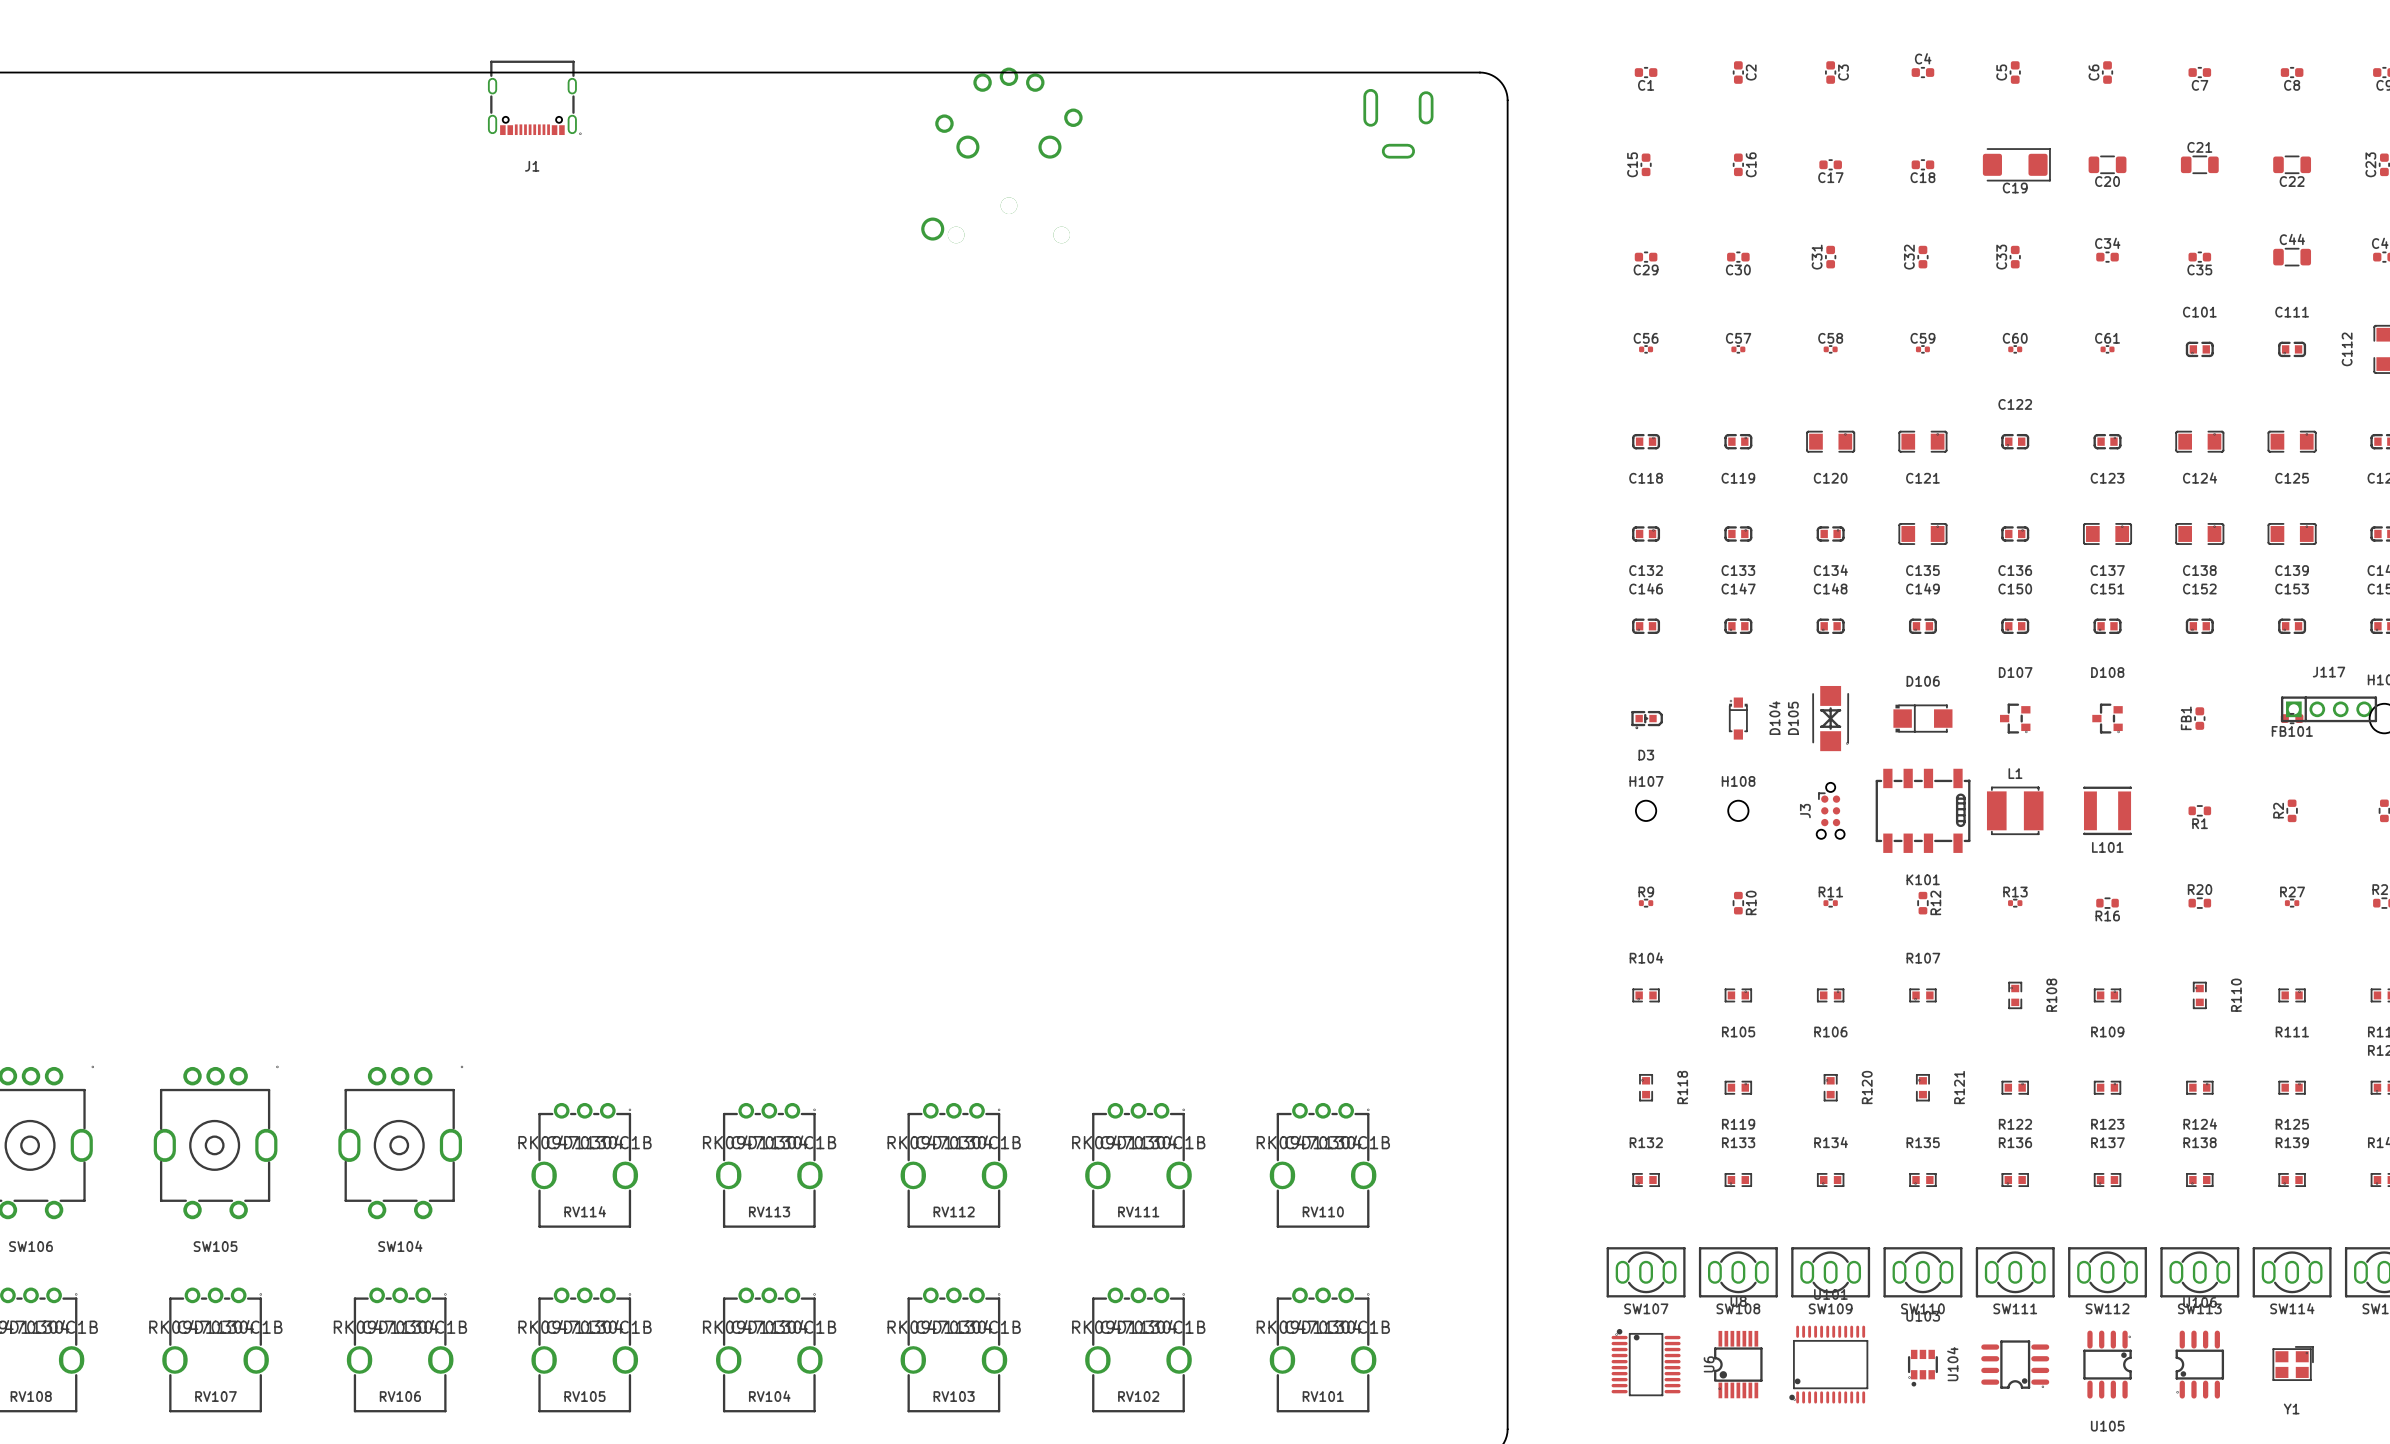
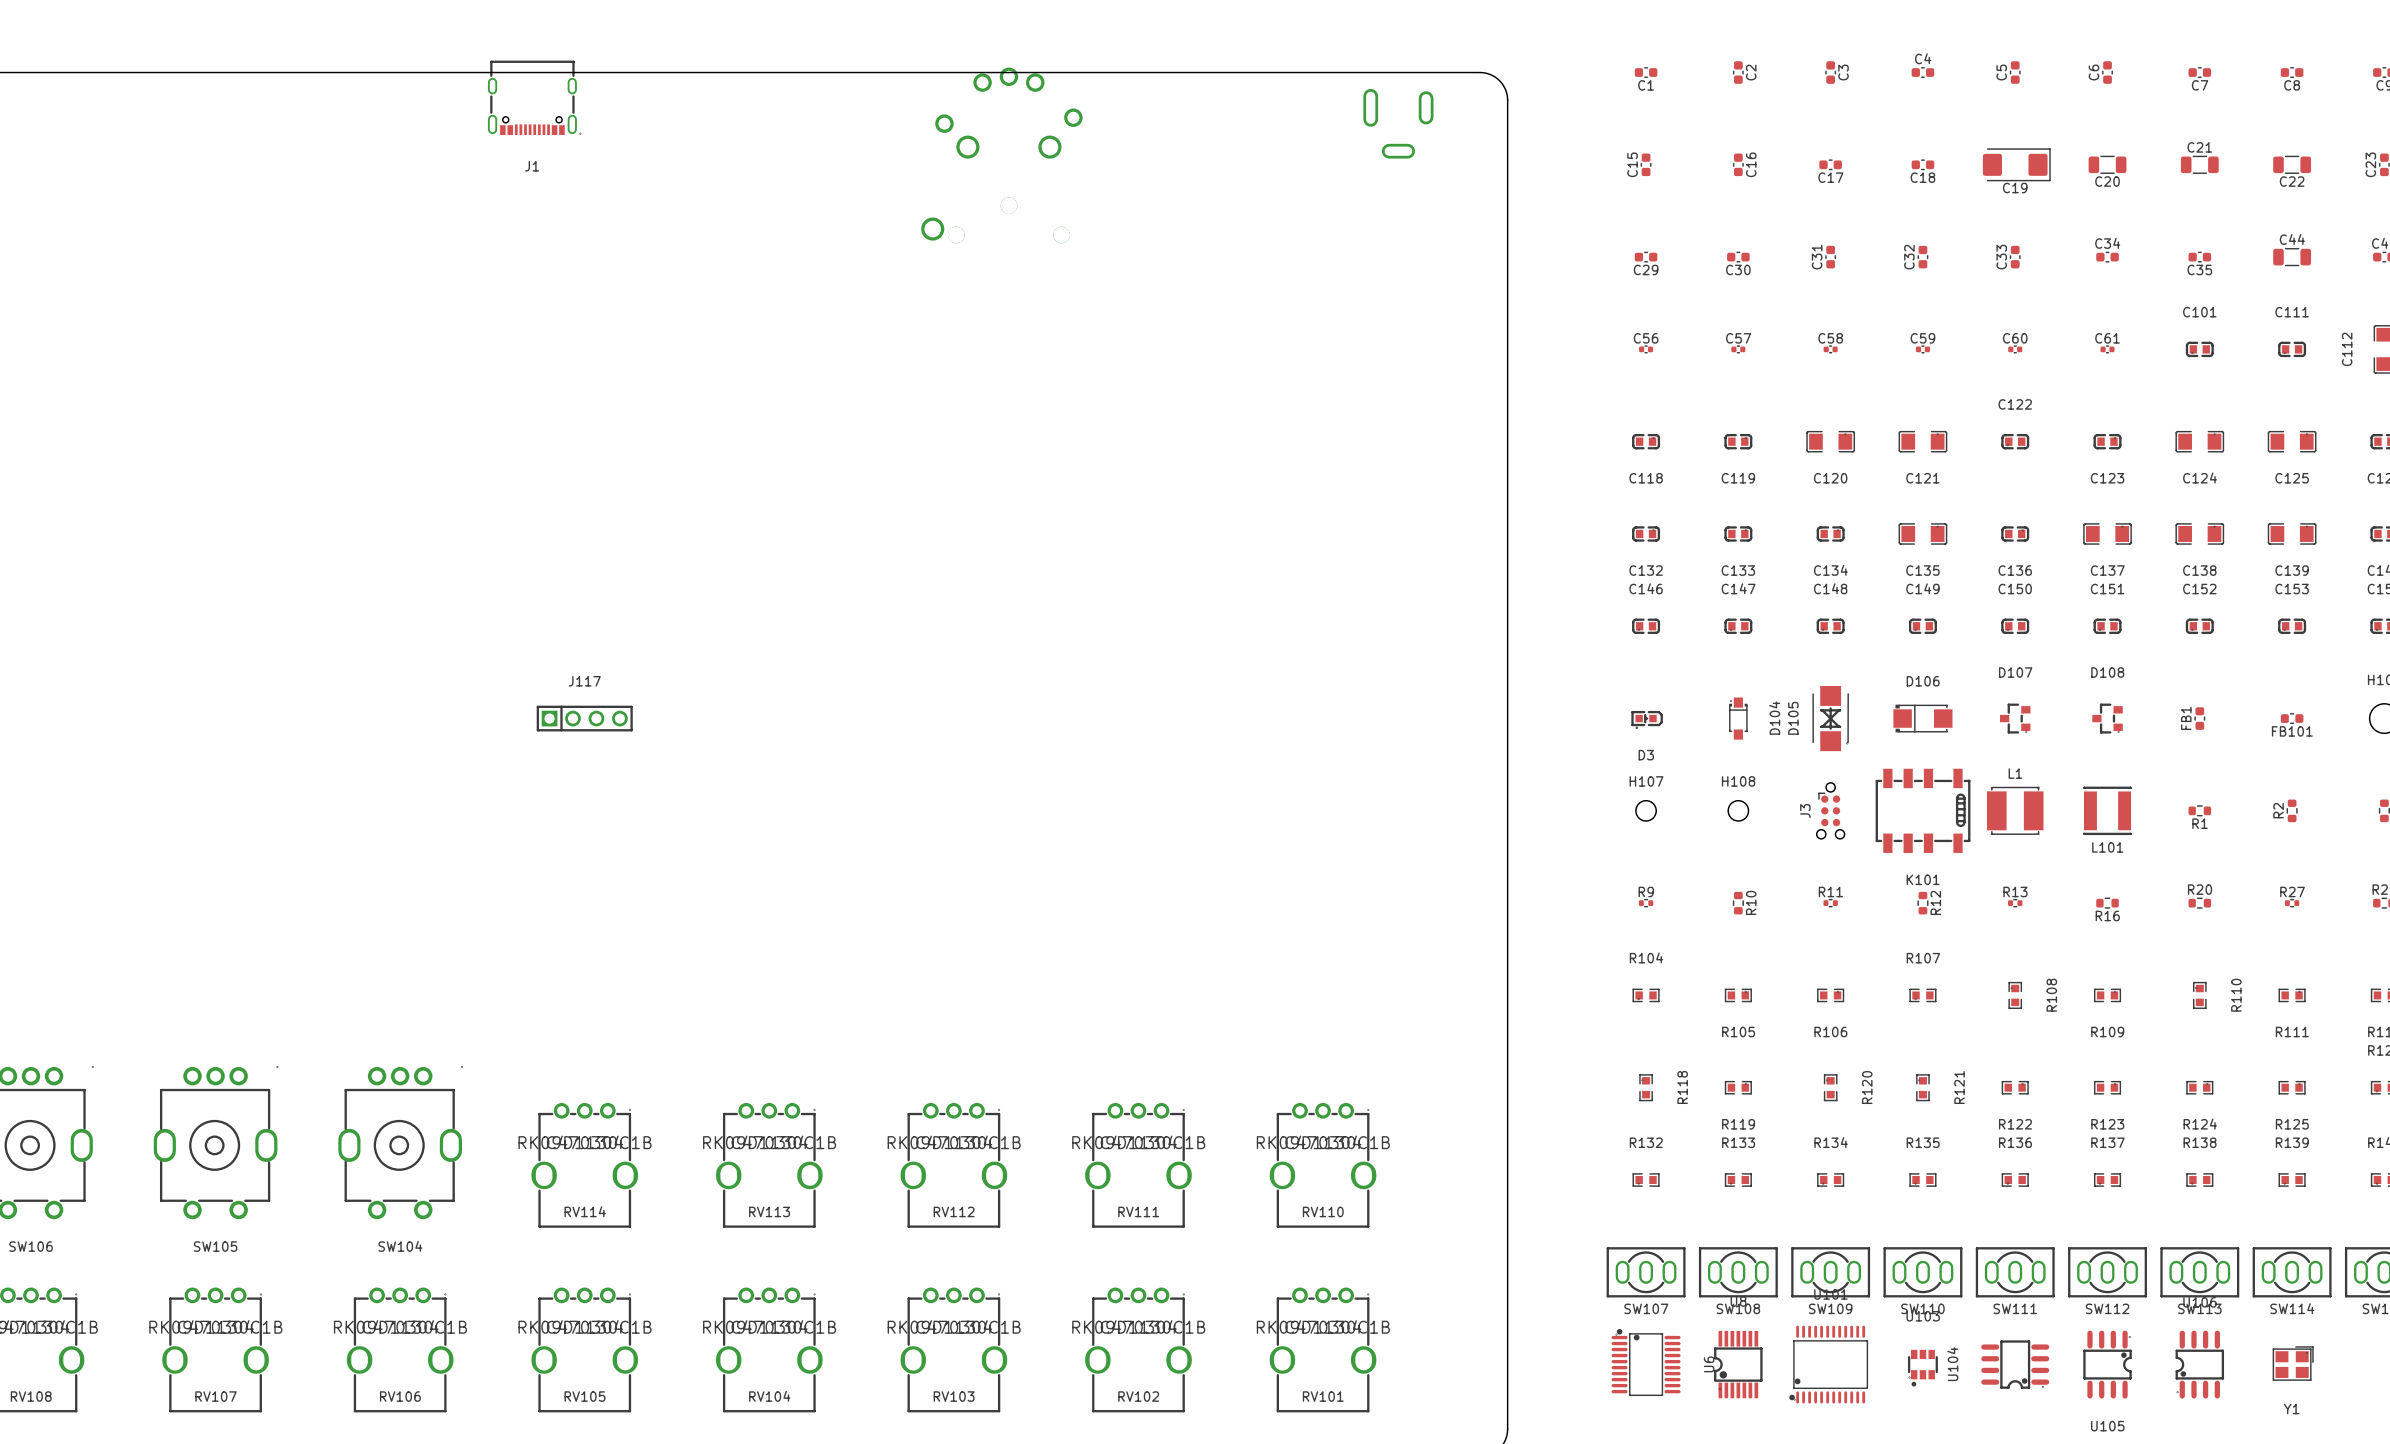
J117 position: (2329, 709) -> (584, 718)

